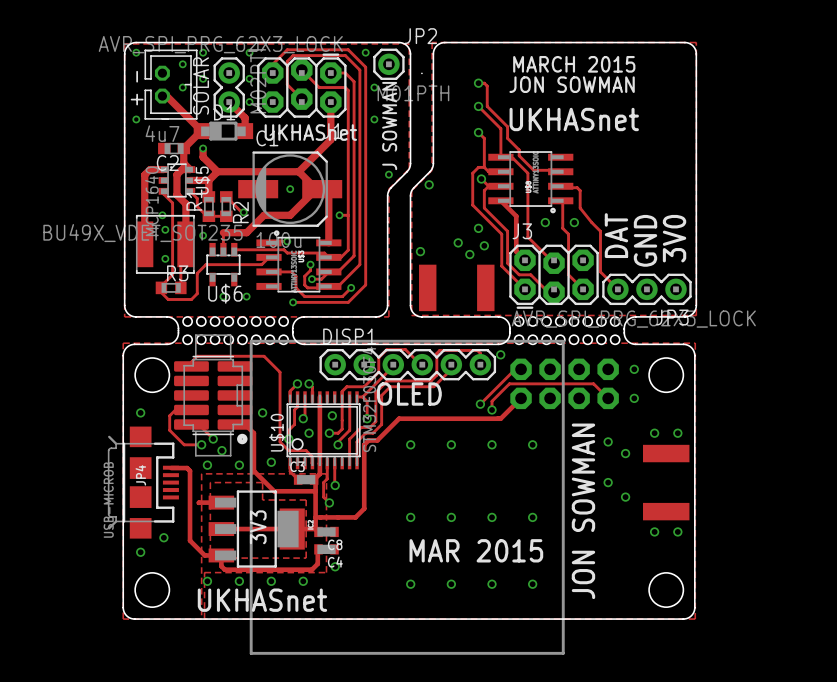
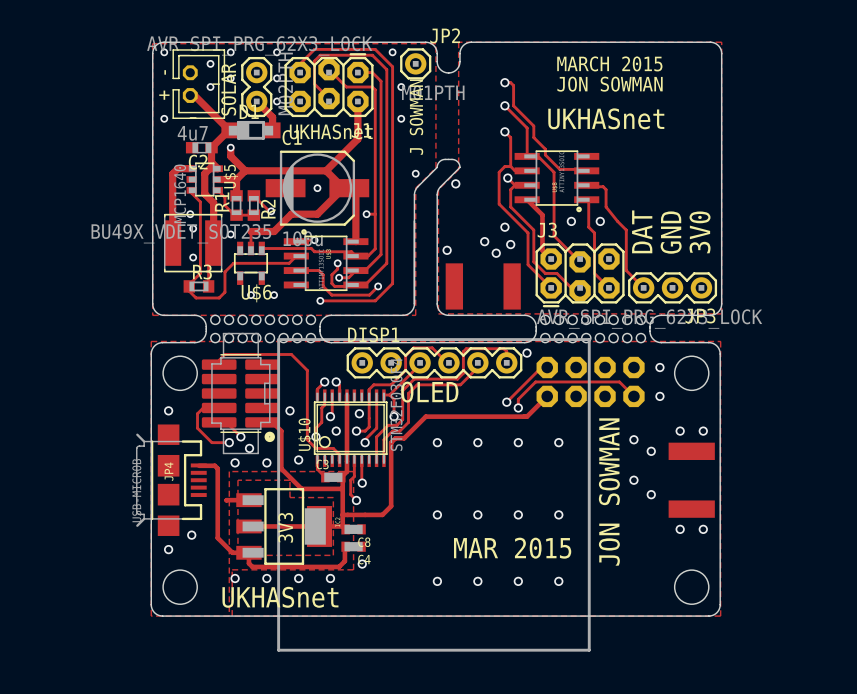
board edge: (410, 53) (410, 163) (407, 171) -> (437, 53) (438, 65) (444, 72) (450, 72) (455, 70) (459, 61)
board edge: (433, 61) (433, 163) (430, 171) -> (433, 170) (439, 161) (445, 159) (457, 161) (459, 167) (456, 170)

